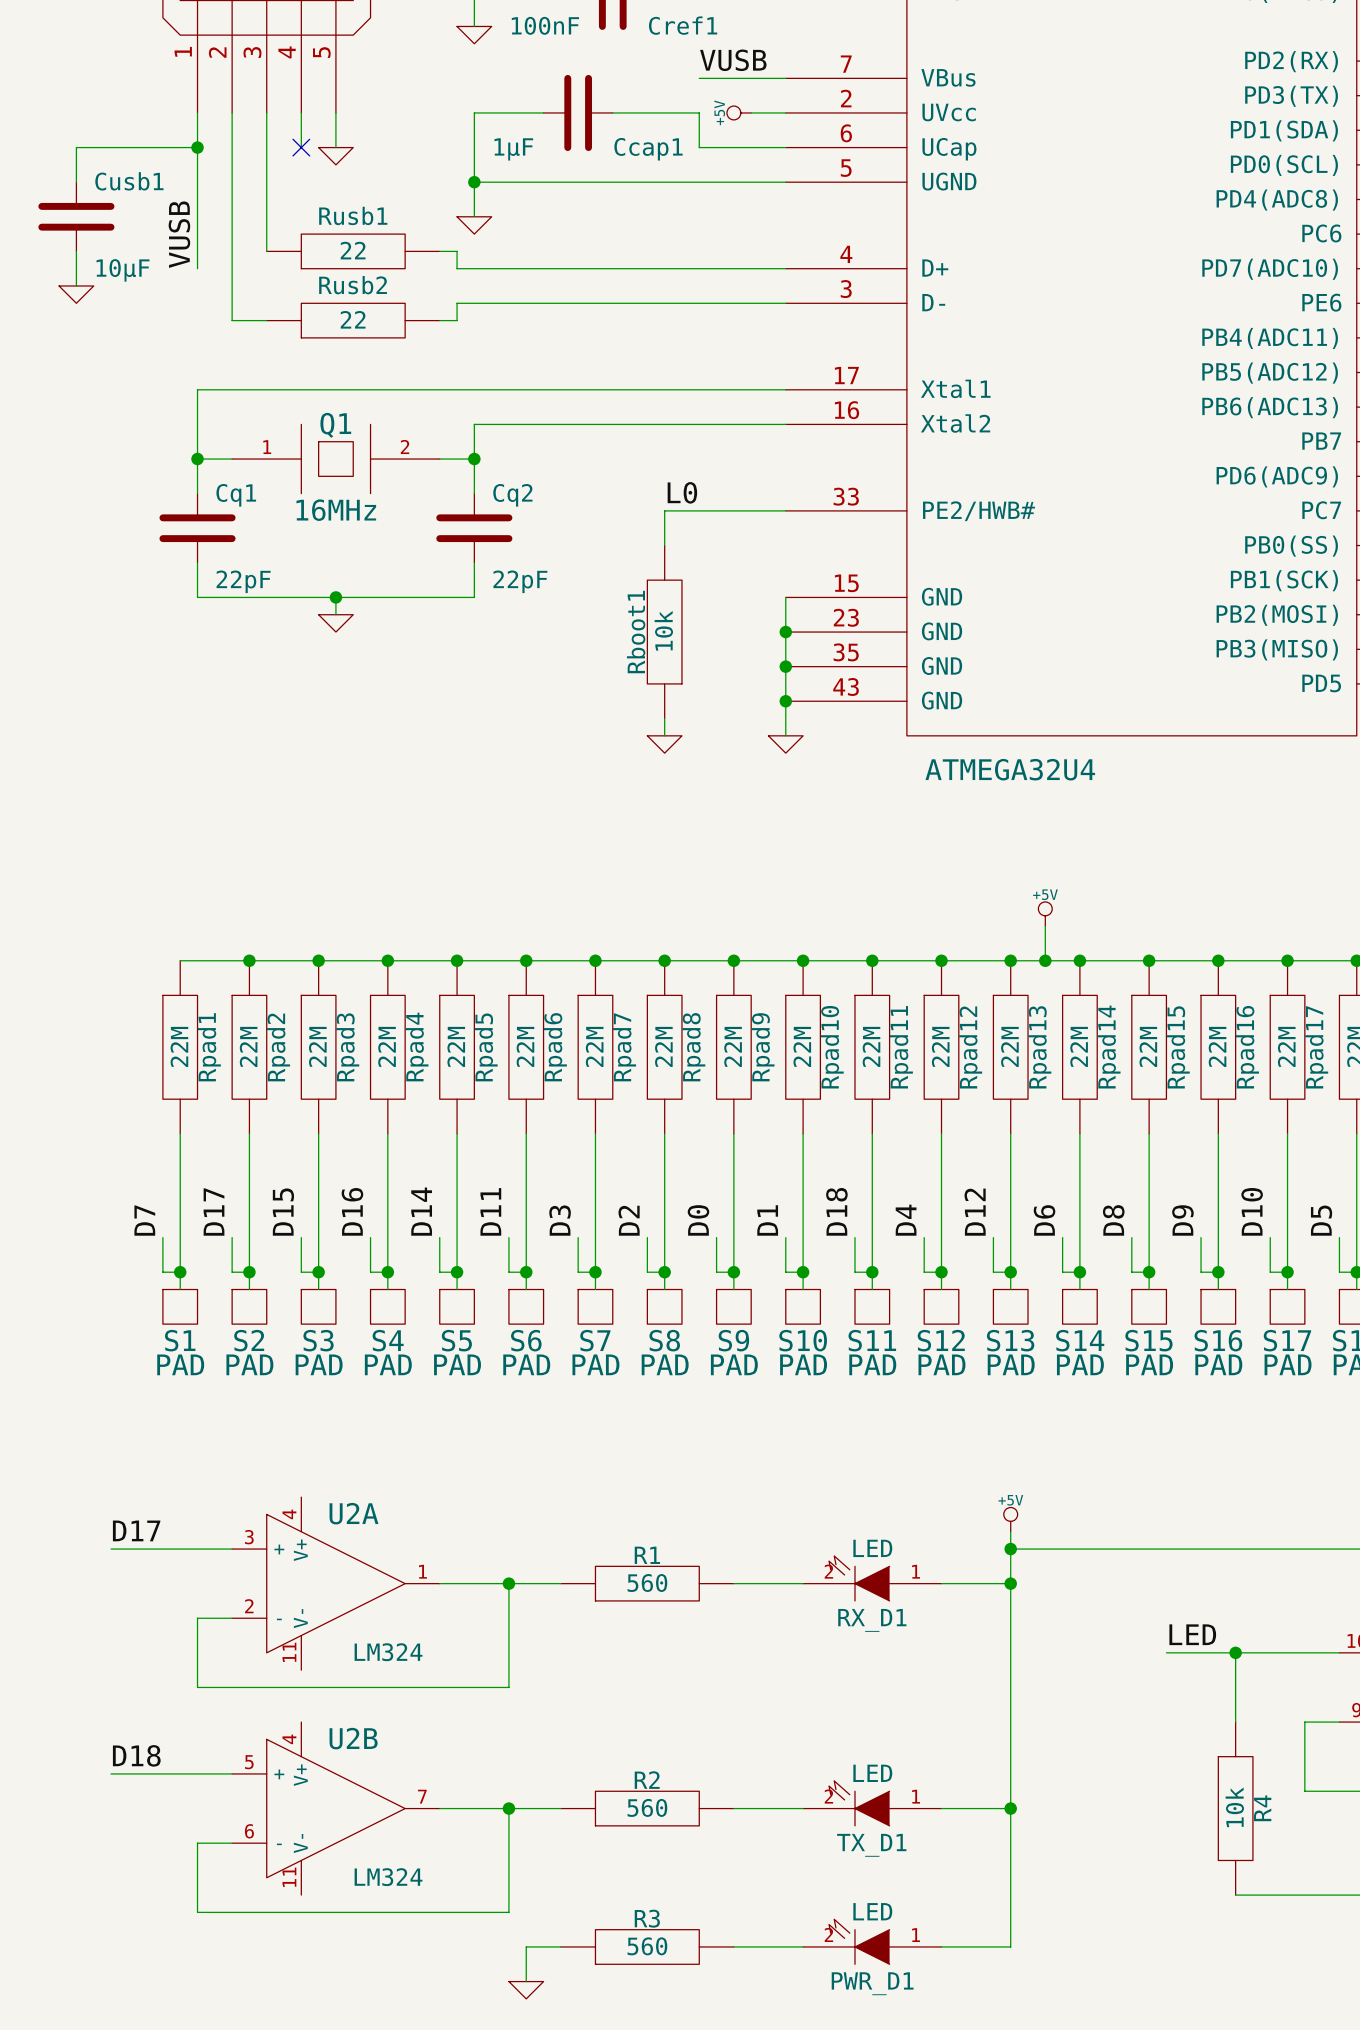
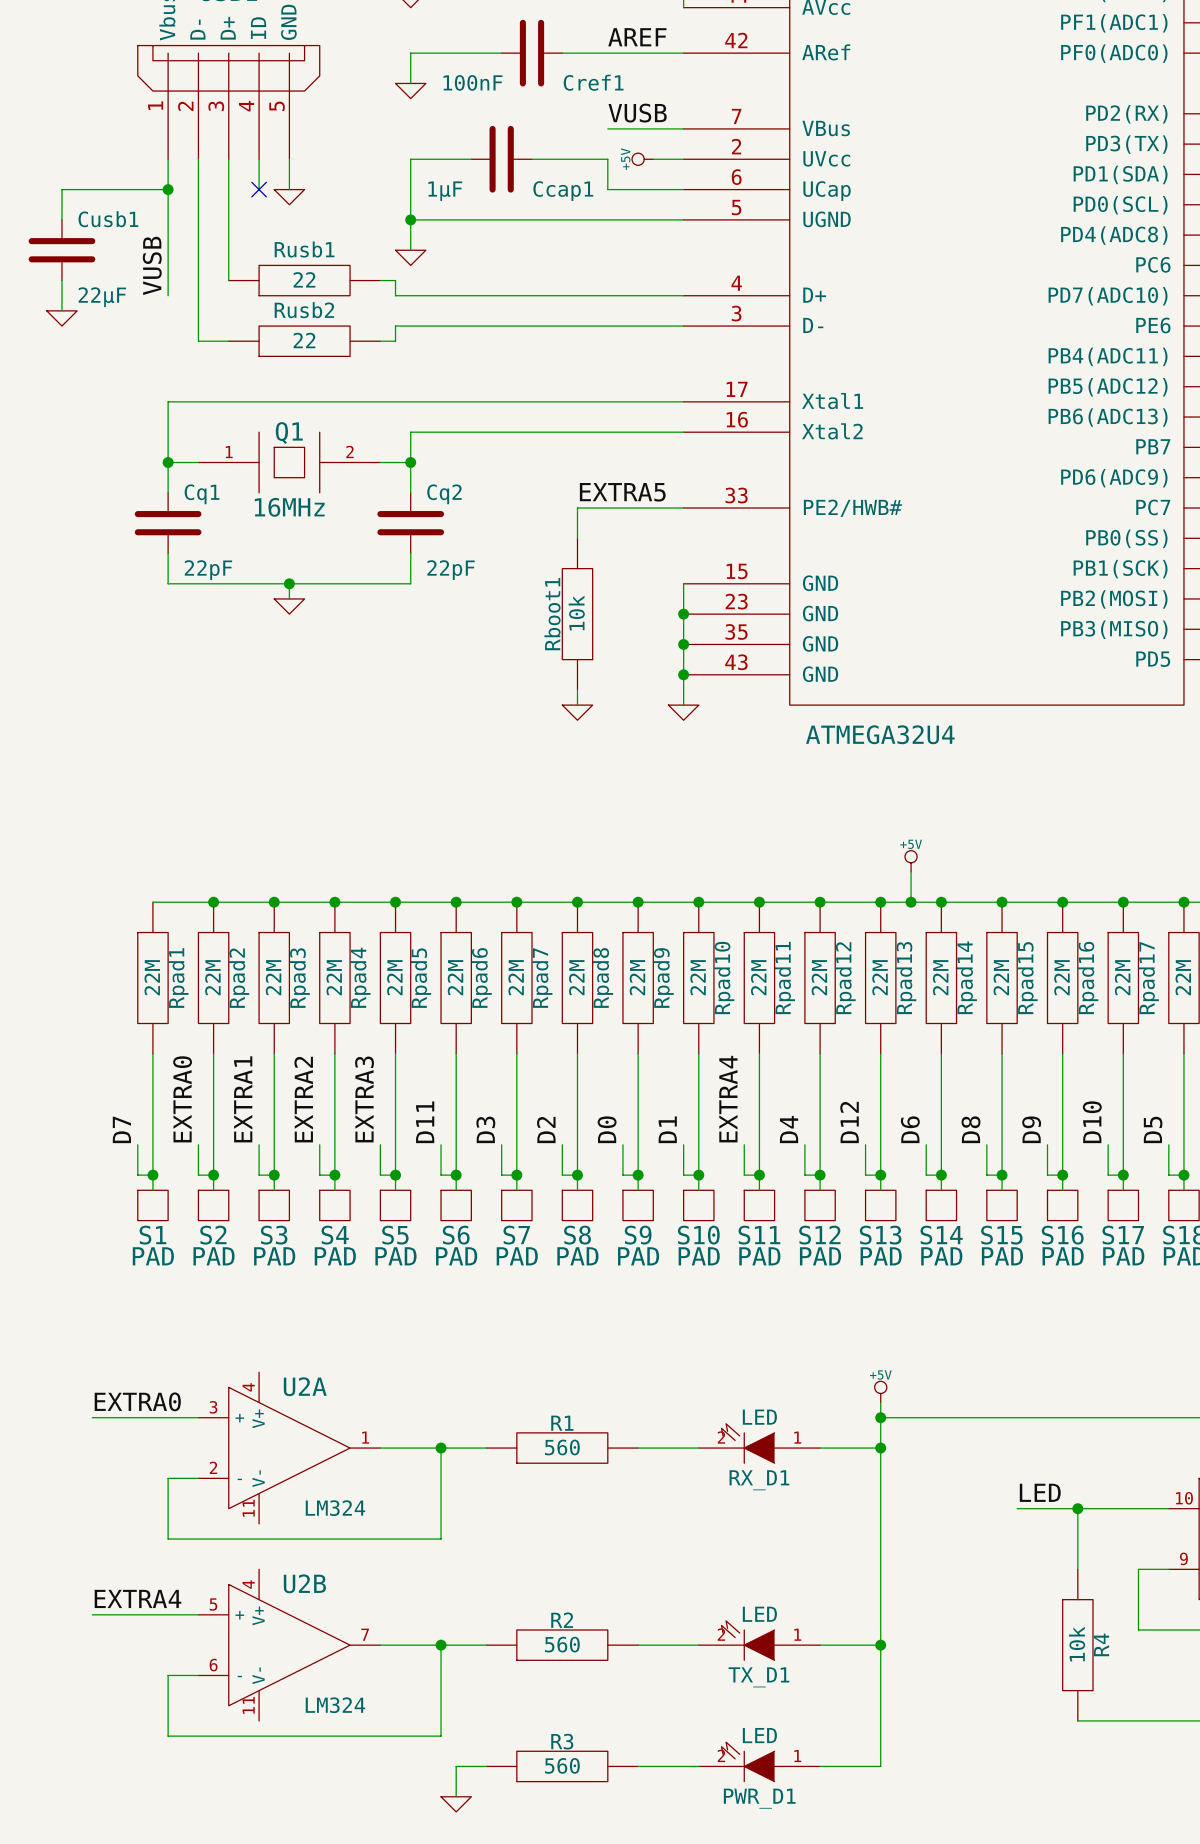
Cusb1 value: 10µF (123, 270) -> 22µF (102, 297)
label: L0 (682, 492) -> EXTRA5 (622, 492)
label: D16 (352, 1211) -> EXTRA2 (303, 1099)
label: D14 (421, 1211) -> EXTRA3 (364, 1099)
label: D18 (836, 1211) -> EXTRA4 (728, 1099)
label: D17 (214, 1212) -> EXTRA0 (182, 1099)
label: D15 (283, 1212) -> EXTRA1 (243, 1099)
label: D17 (136, 1530) -> EXTRA0 (137, 1401)
label: D18 (136, 1755) -> EXTRA4 (137, 1598)

